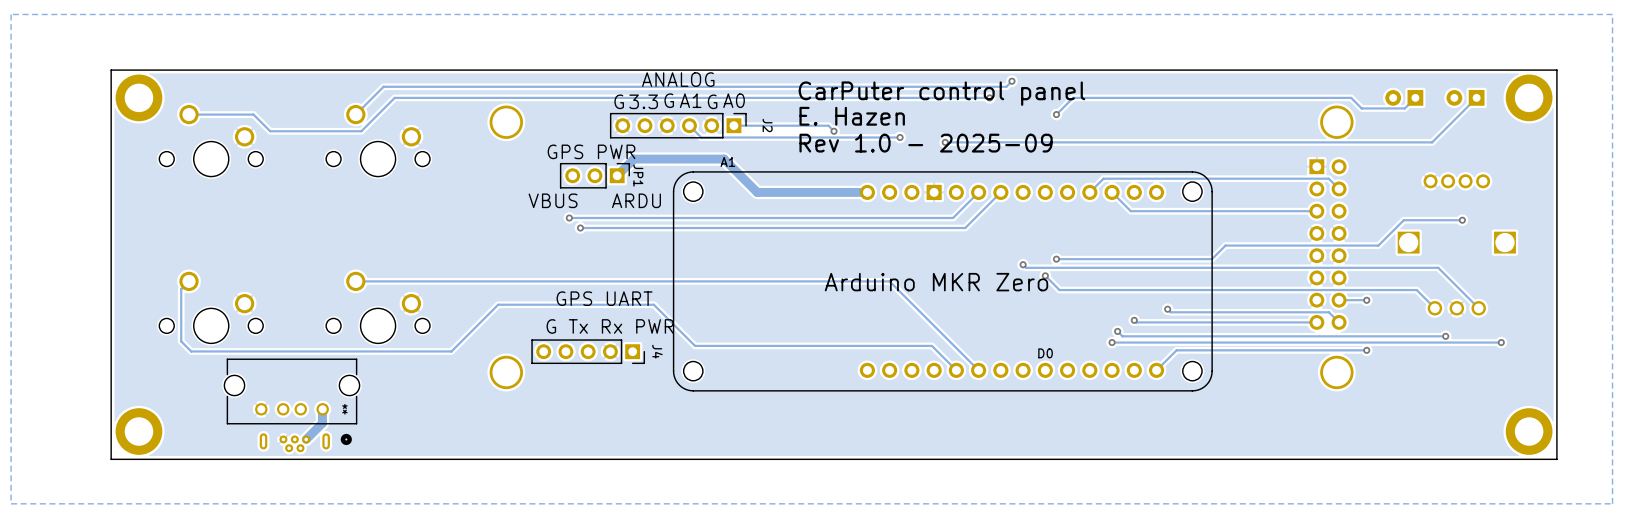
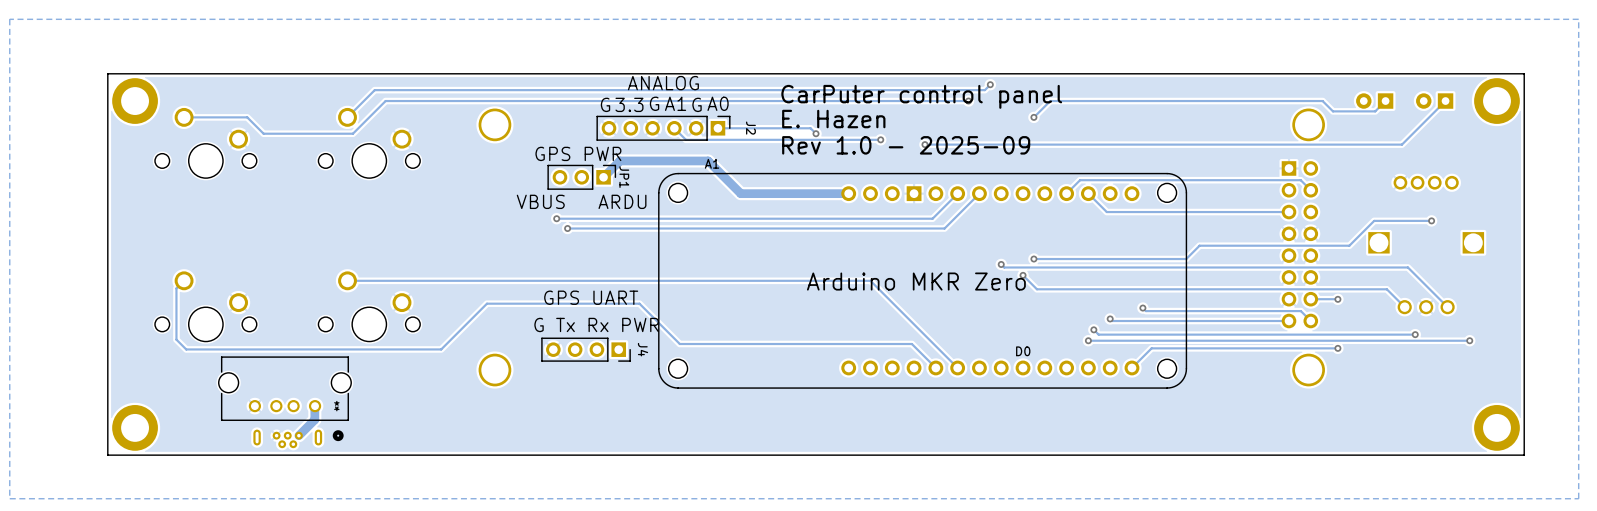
J4 footprint: [531, 339, 645, 364] -> [541, 337, 631, 362]

